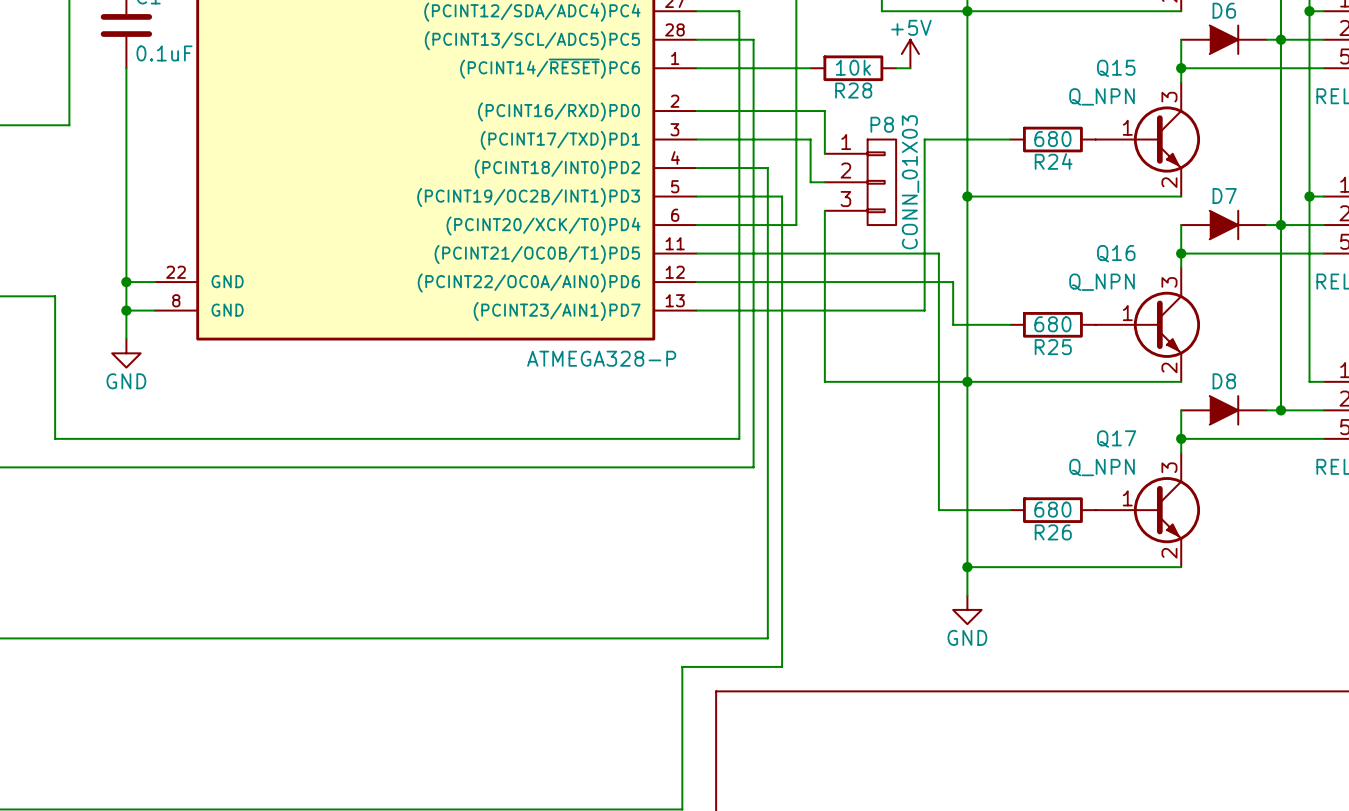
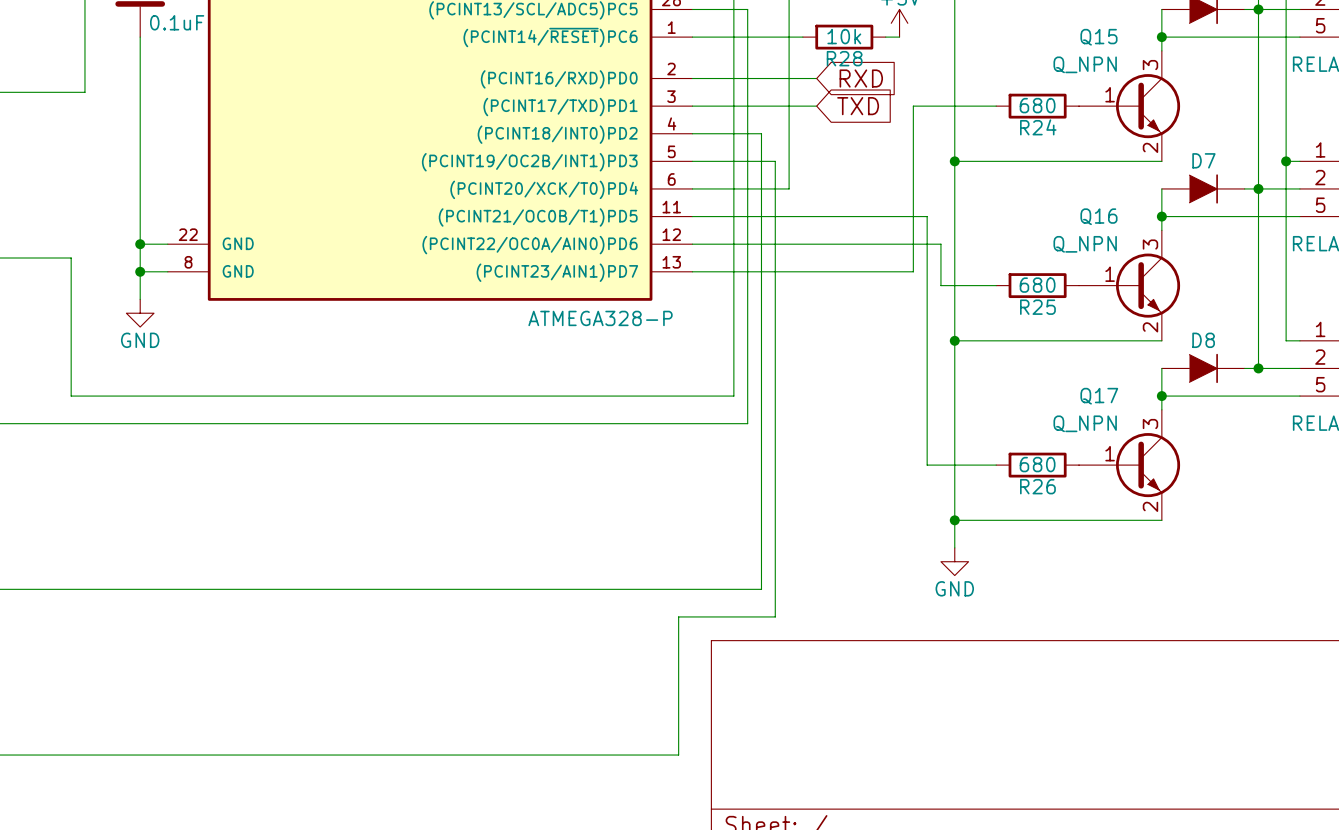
wire: (824, 111) (824, 153) -> none
global label: none -> RXD (861, 78)
wire: (810, 139) (810, 182) (824, 182) -> (802, 106) (816, 106)
global label: none -> TXD (858, 106)
P8: CONN_01X03 (860, 182) -> none
wire: (824, 210) (824, 381) (967, 381) -> none

